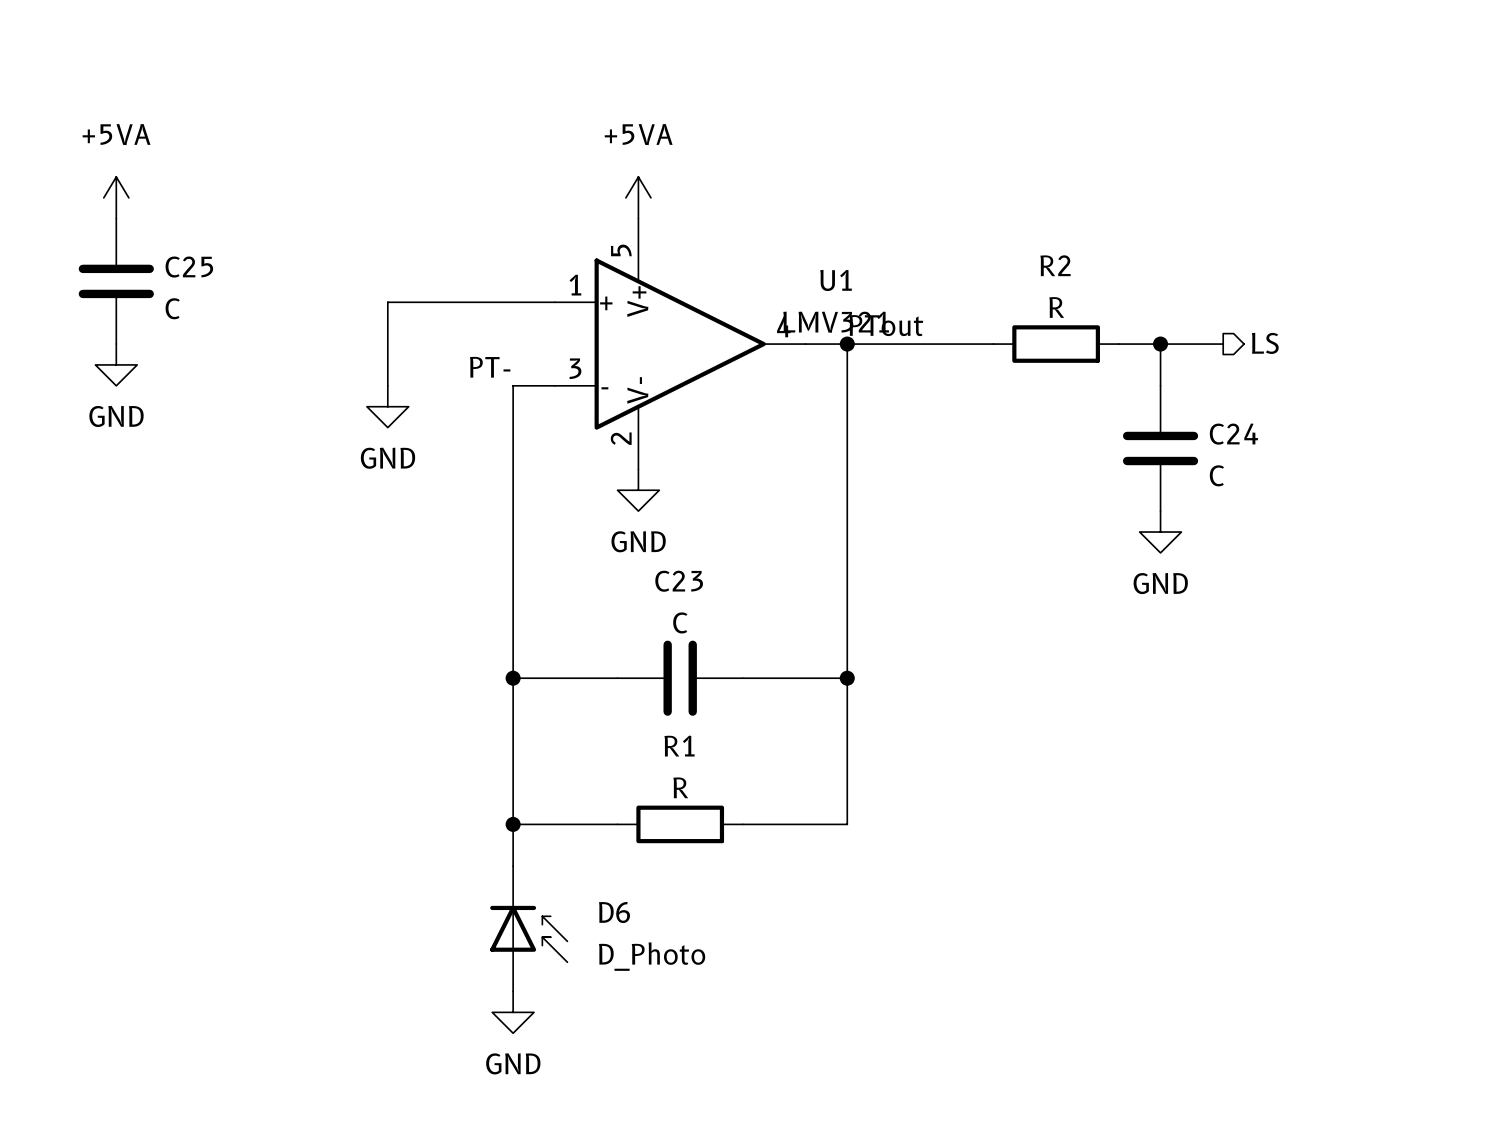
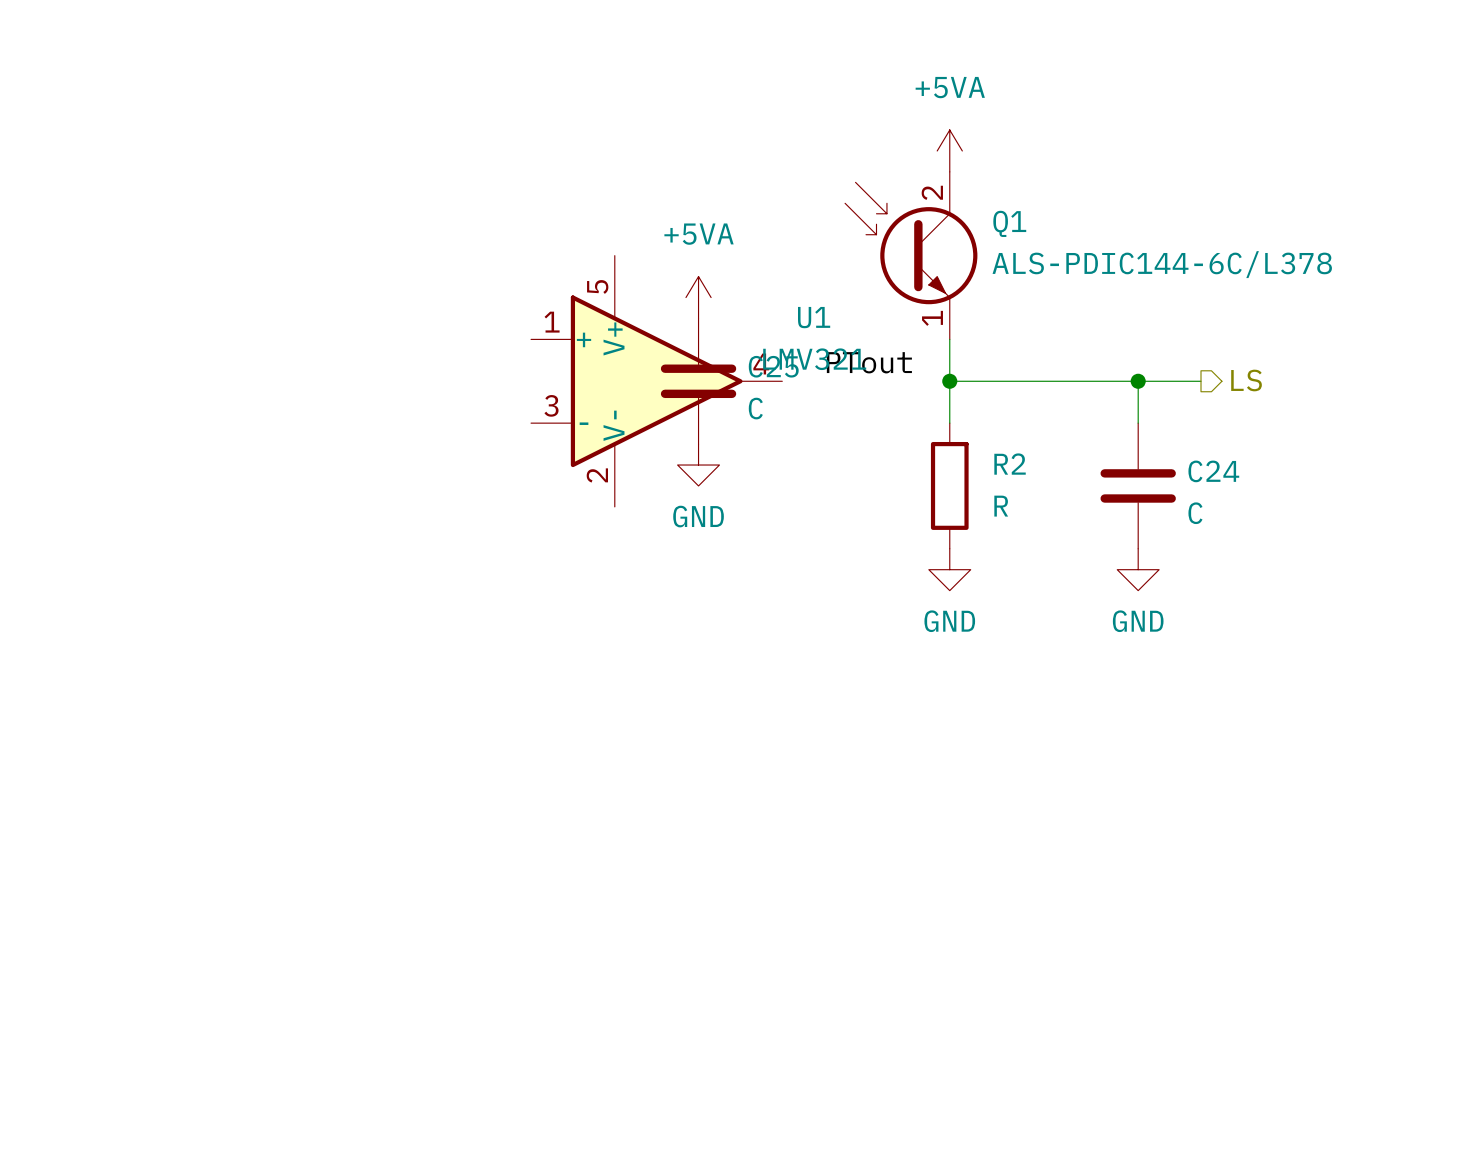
power symbol: none -> +5VA (949, 150)
power symbol: +5VA (116, 197) -> none
power symbol position: +5VA (638, 197) -> +5VA (698, 297)
Q1: none -> ALS-PDIC144-6C/L378 (911, 255)
C25 position: (116, 281) -> (698, 381)
wire: (554, 302) (387, 302) (387, 385) -> none
wire: none -> (949, 339) (949, 423)
wire: (805, 344) (972, 344) -> none
wire: (847, 344) (847, 824) (742, 824) -> none
junction: (847, 344) -> none
junction: none -> (949, 381)
wire: none -> (970, 381) (1096, 381)
R2 rotation: 0° (1056, 344) -> 90° clockwise (949, 485)
R2 position: (1056, 344) -> (949, 485)
power symbol: GND (116, 364) -> none
label: PT- (490, 367) -> none
wire: (554, 385) (513, 385) (513, 866) -> none
power symbol: GND (387, 406) -> none
power symbol position: GND (638, 490) -> GND (698, 465)
power symbol: none -> GND (949, 569)
wire: (513, 678) (617, 678) -> none
junction: (513, 678) -> none
C23: C (680, 678) -> none
wire: (742, 678) (847, 678) -> none
junction: (847, 678) -> none
wire: (513, 824) (617, 824) -> none
junction: (513, 824) -> none
R1: R (680, 824) -> none
D6: D_Photo (528, 928) -> none
power symbol: GND (513, 1012) -> none

